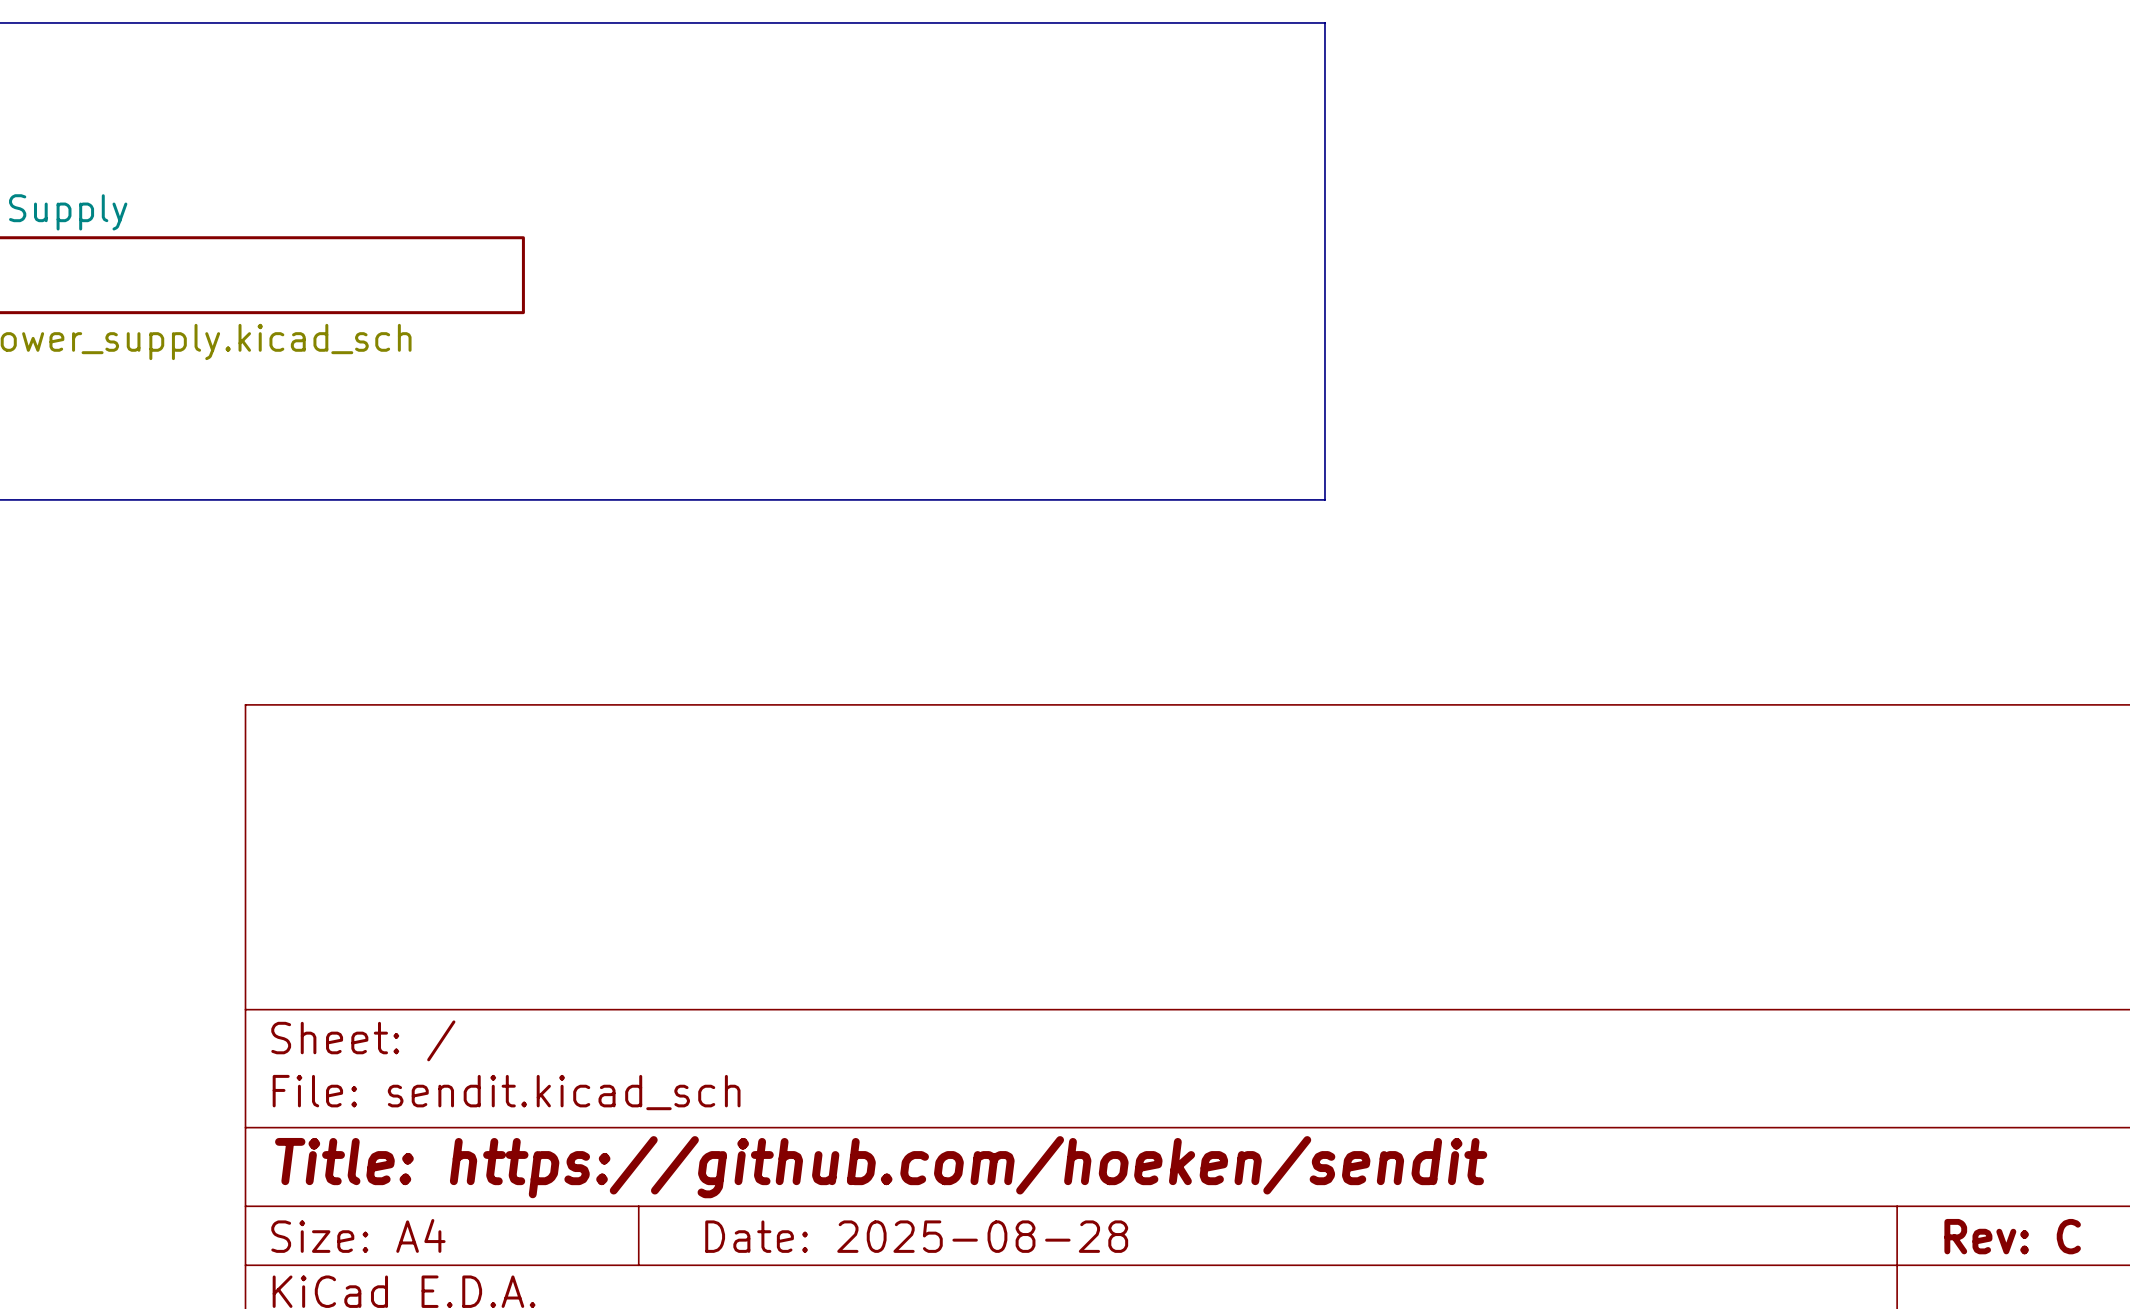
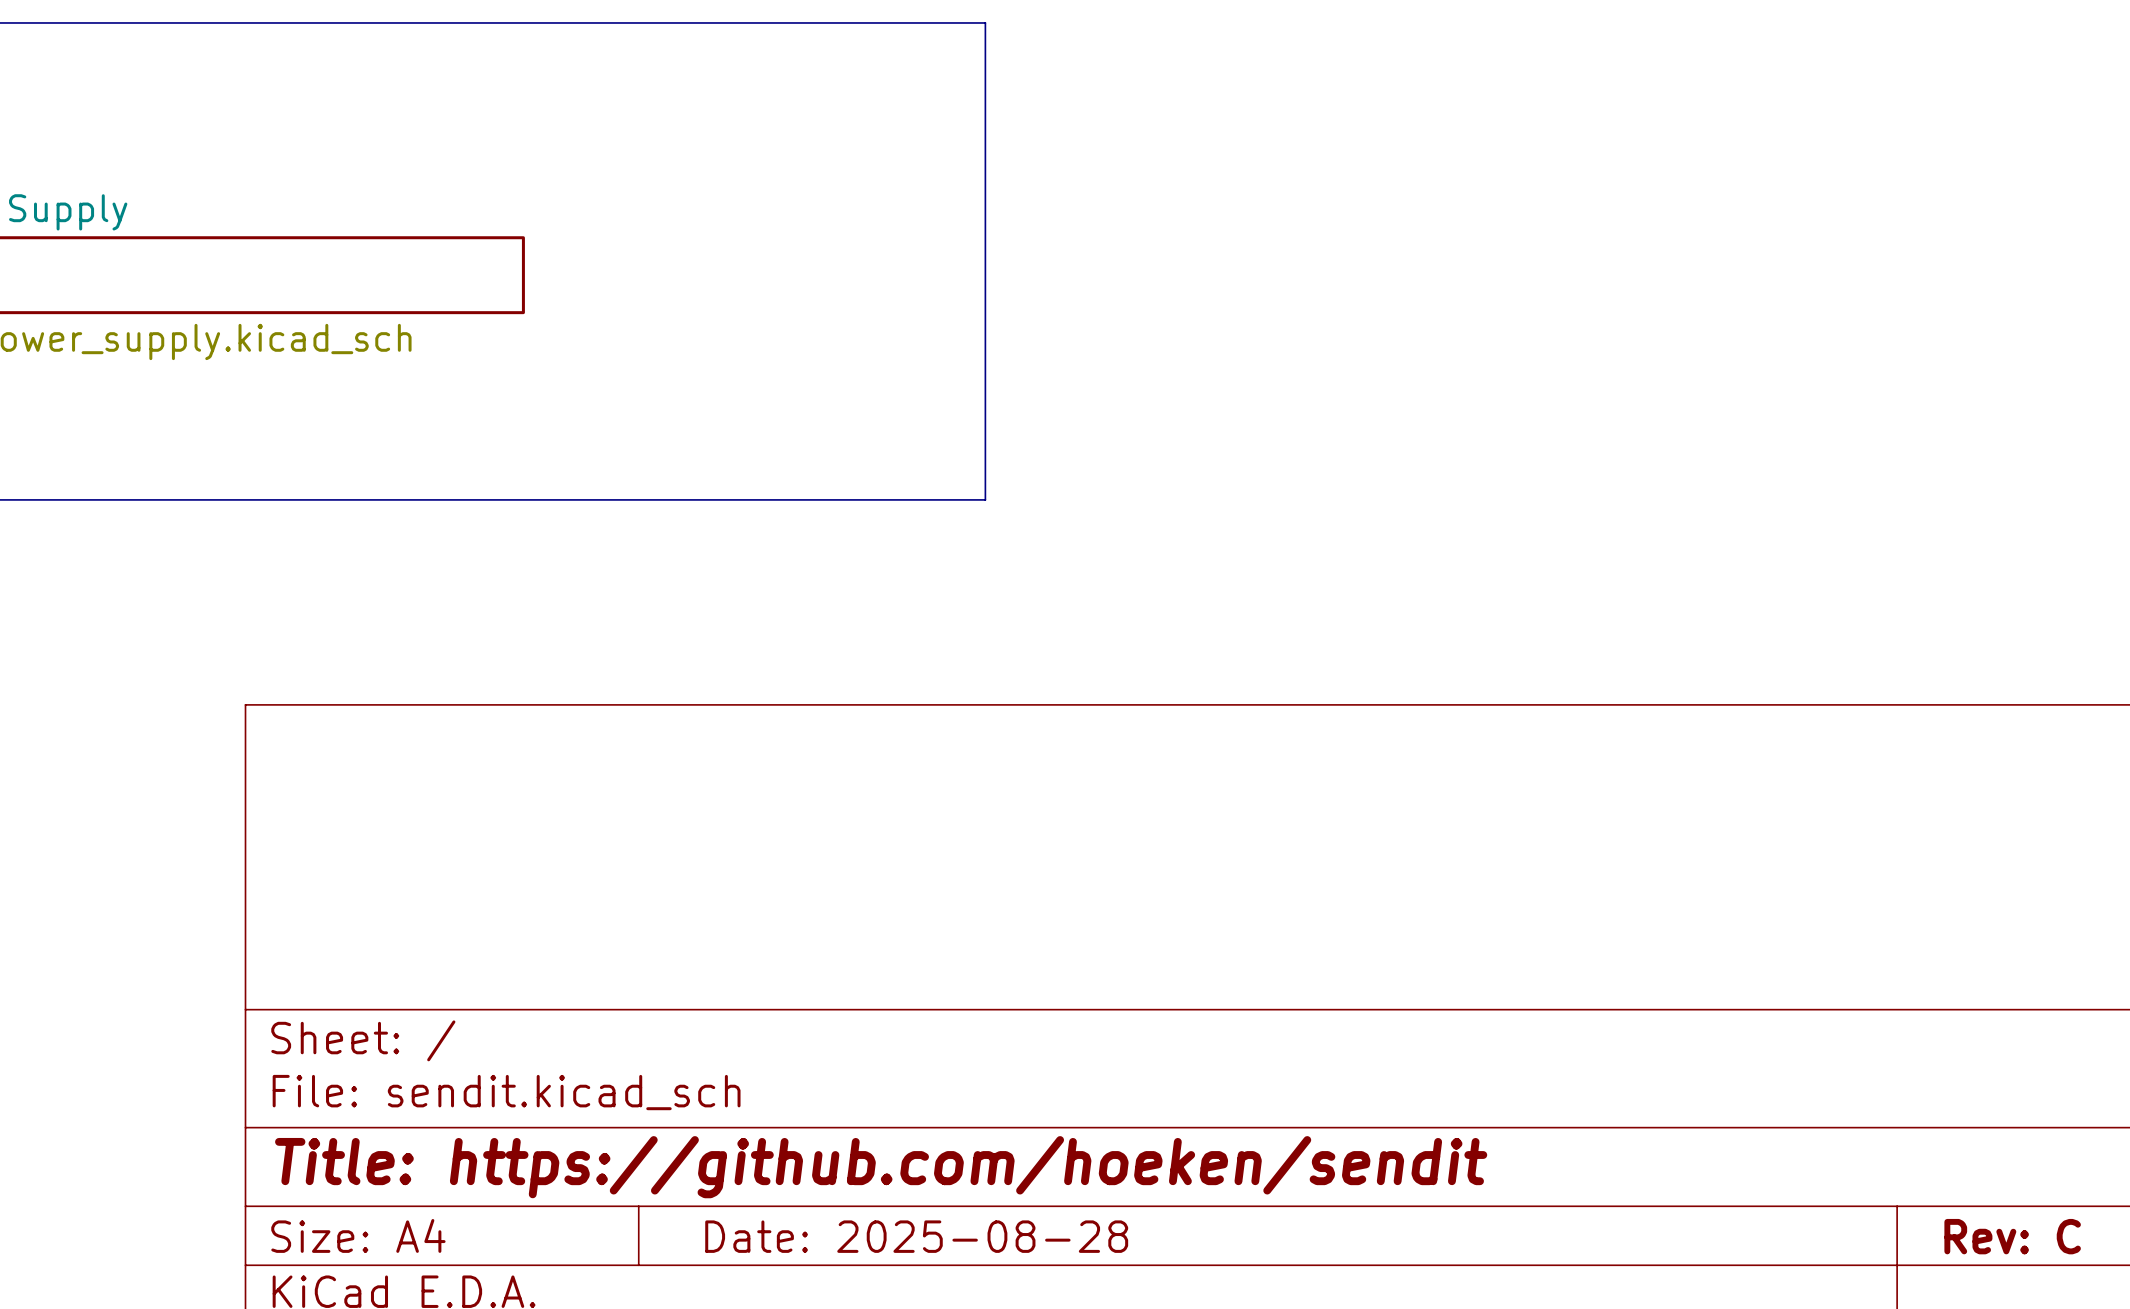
line: (985, 22) (1324, 22) (1324, 499) (985, 499) -> (985, 22) (985, 499)

